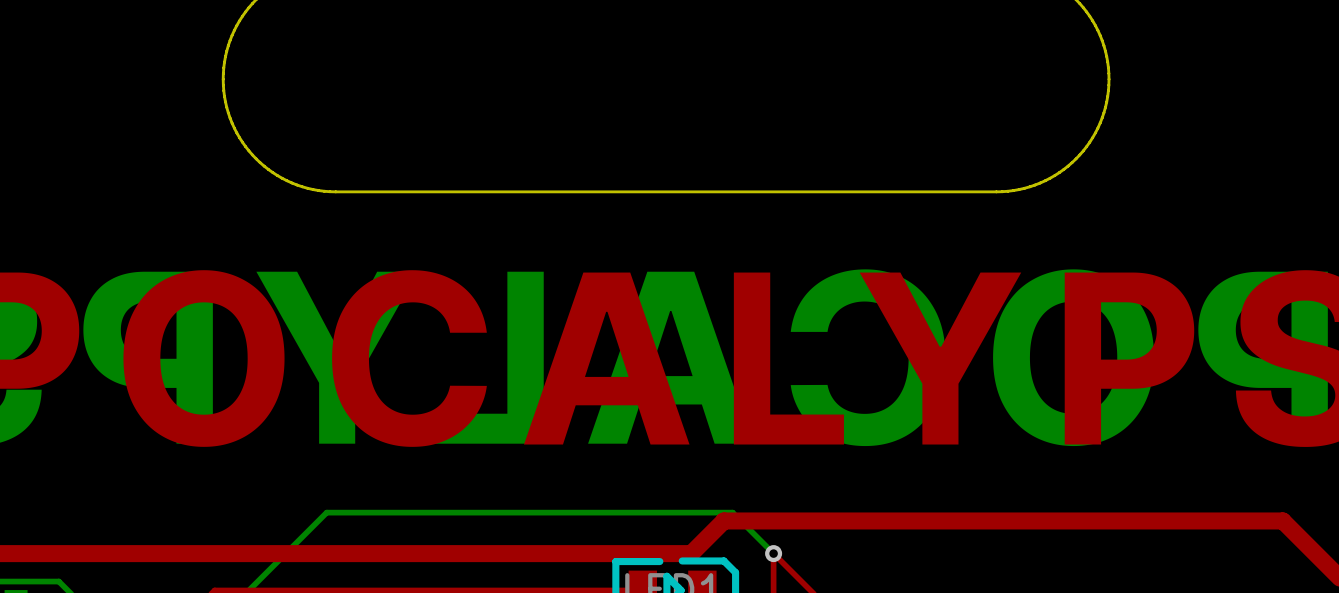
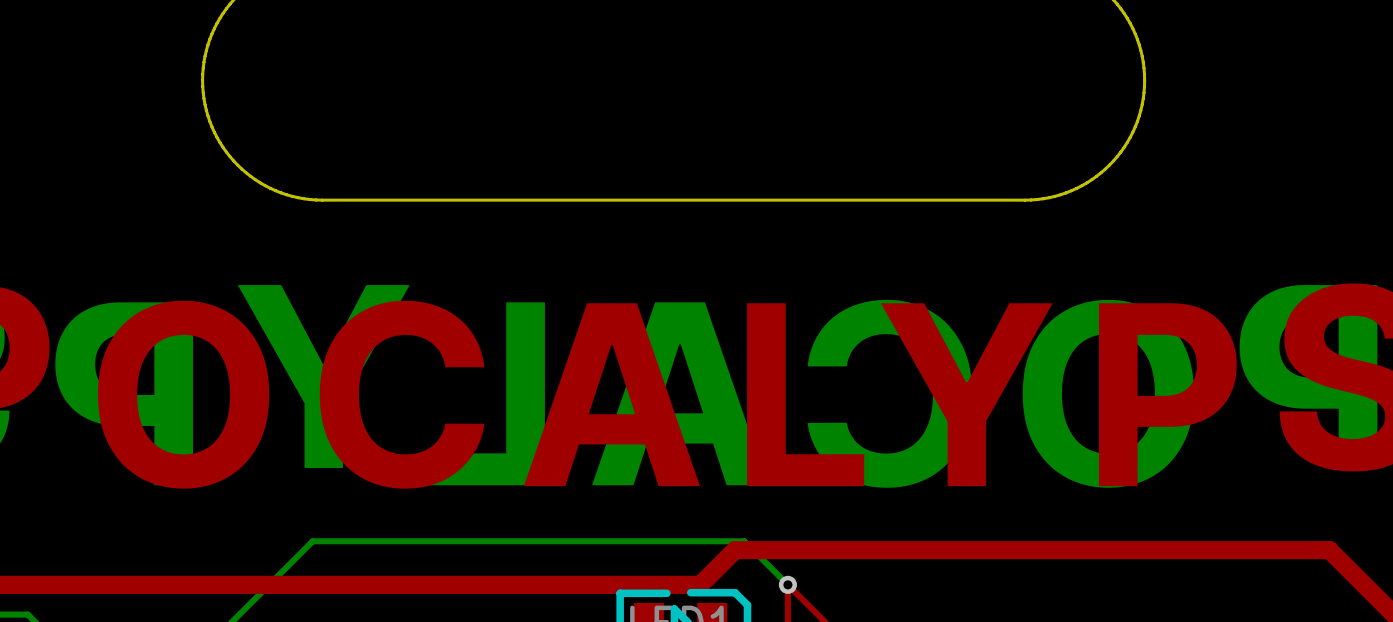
drawing position: (148, 357) -> (124, 393)
drawing position: (488, 357) -> (486, 393)
drawing position: (670, 357) -> (680, 393)
drawing position: (868, 357) -> (889, 393)
drawing position: (1073, 357) -> (1108, 393)
drawing position: (204, 358) -> (183, 394)
drawing position: (409, 358) -> (402, 394)
drawing position: (606, 358) -> (611, 394)
drawing position: (788, 358) -> (805, 394)
drawing position: (940, 358) -> (966, 394)
drawing position: (1129, 358) -> (1167, 394)

